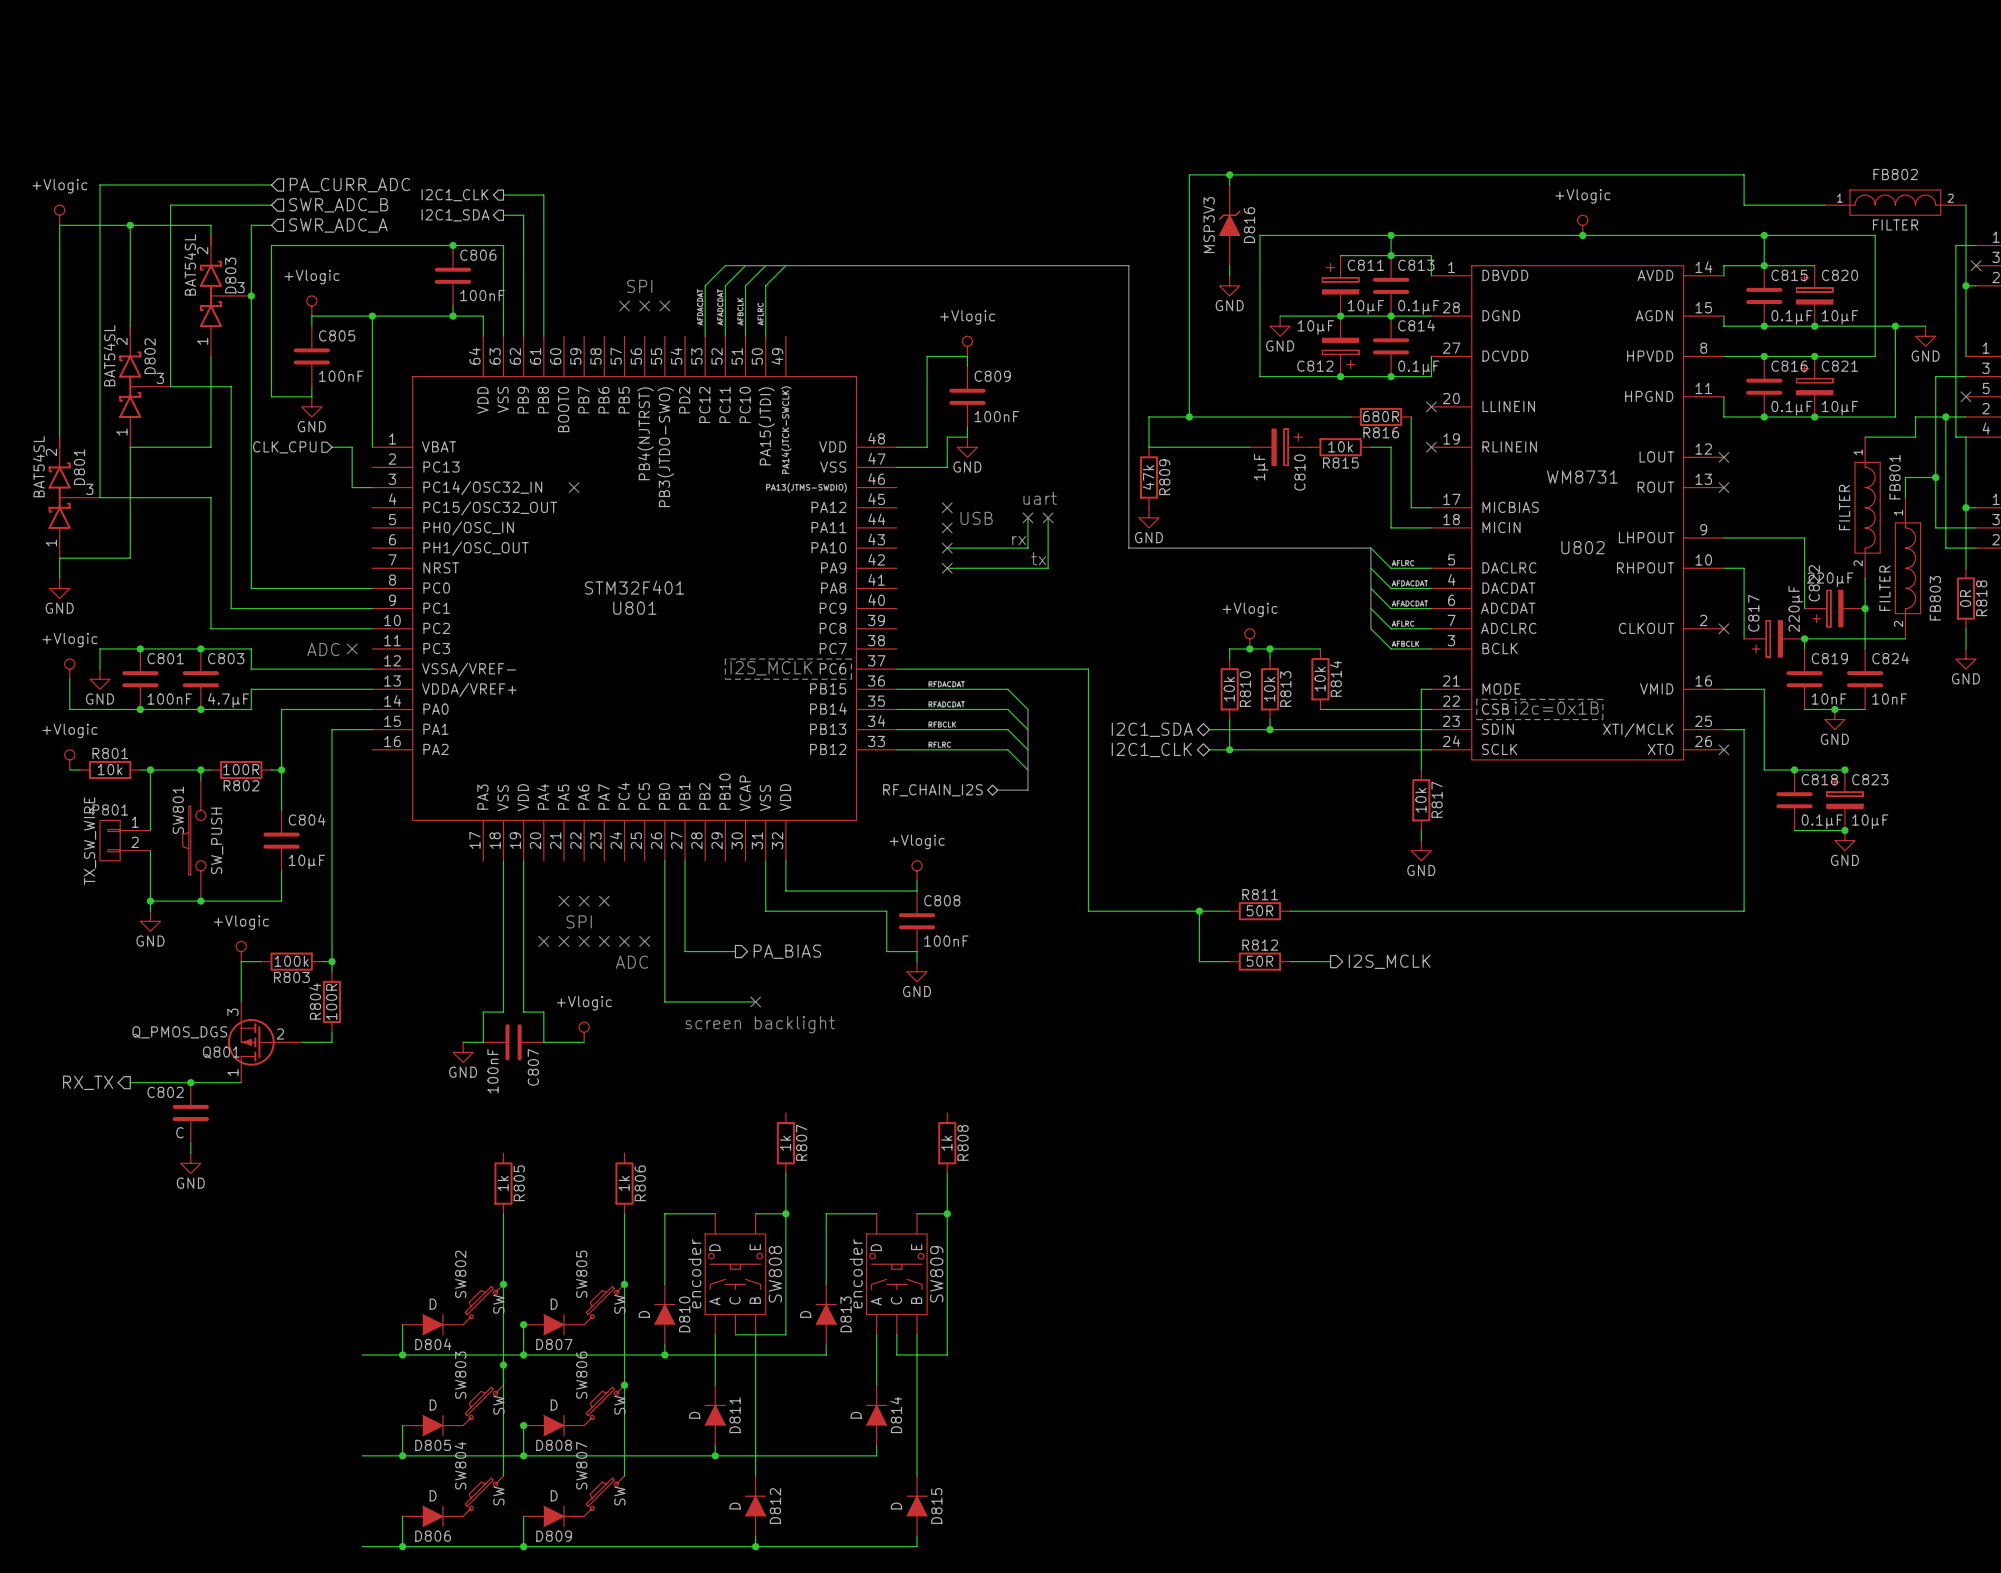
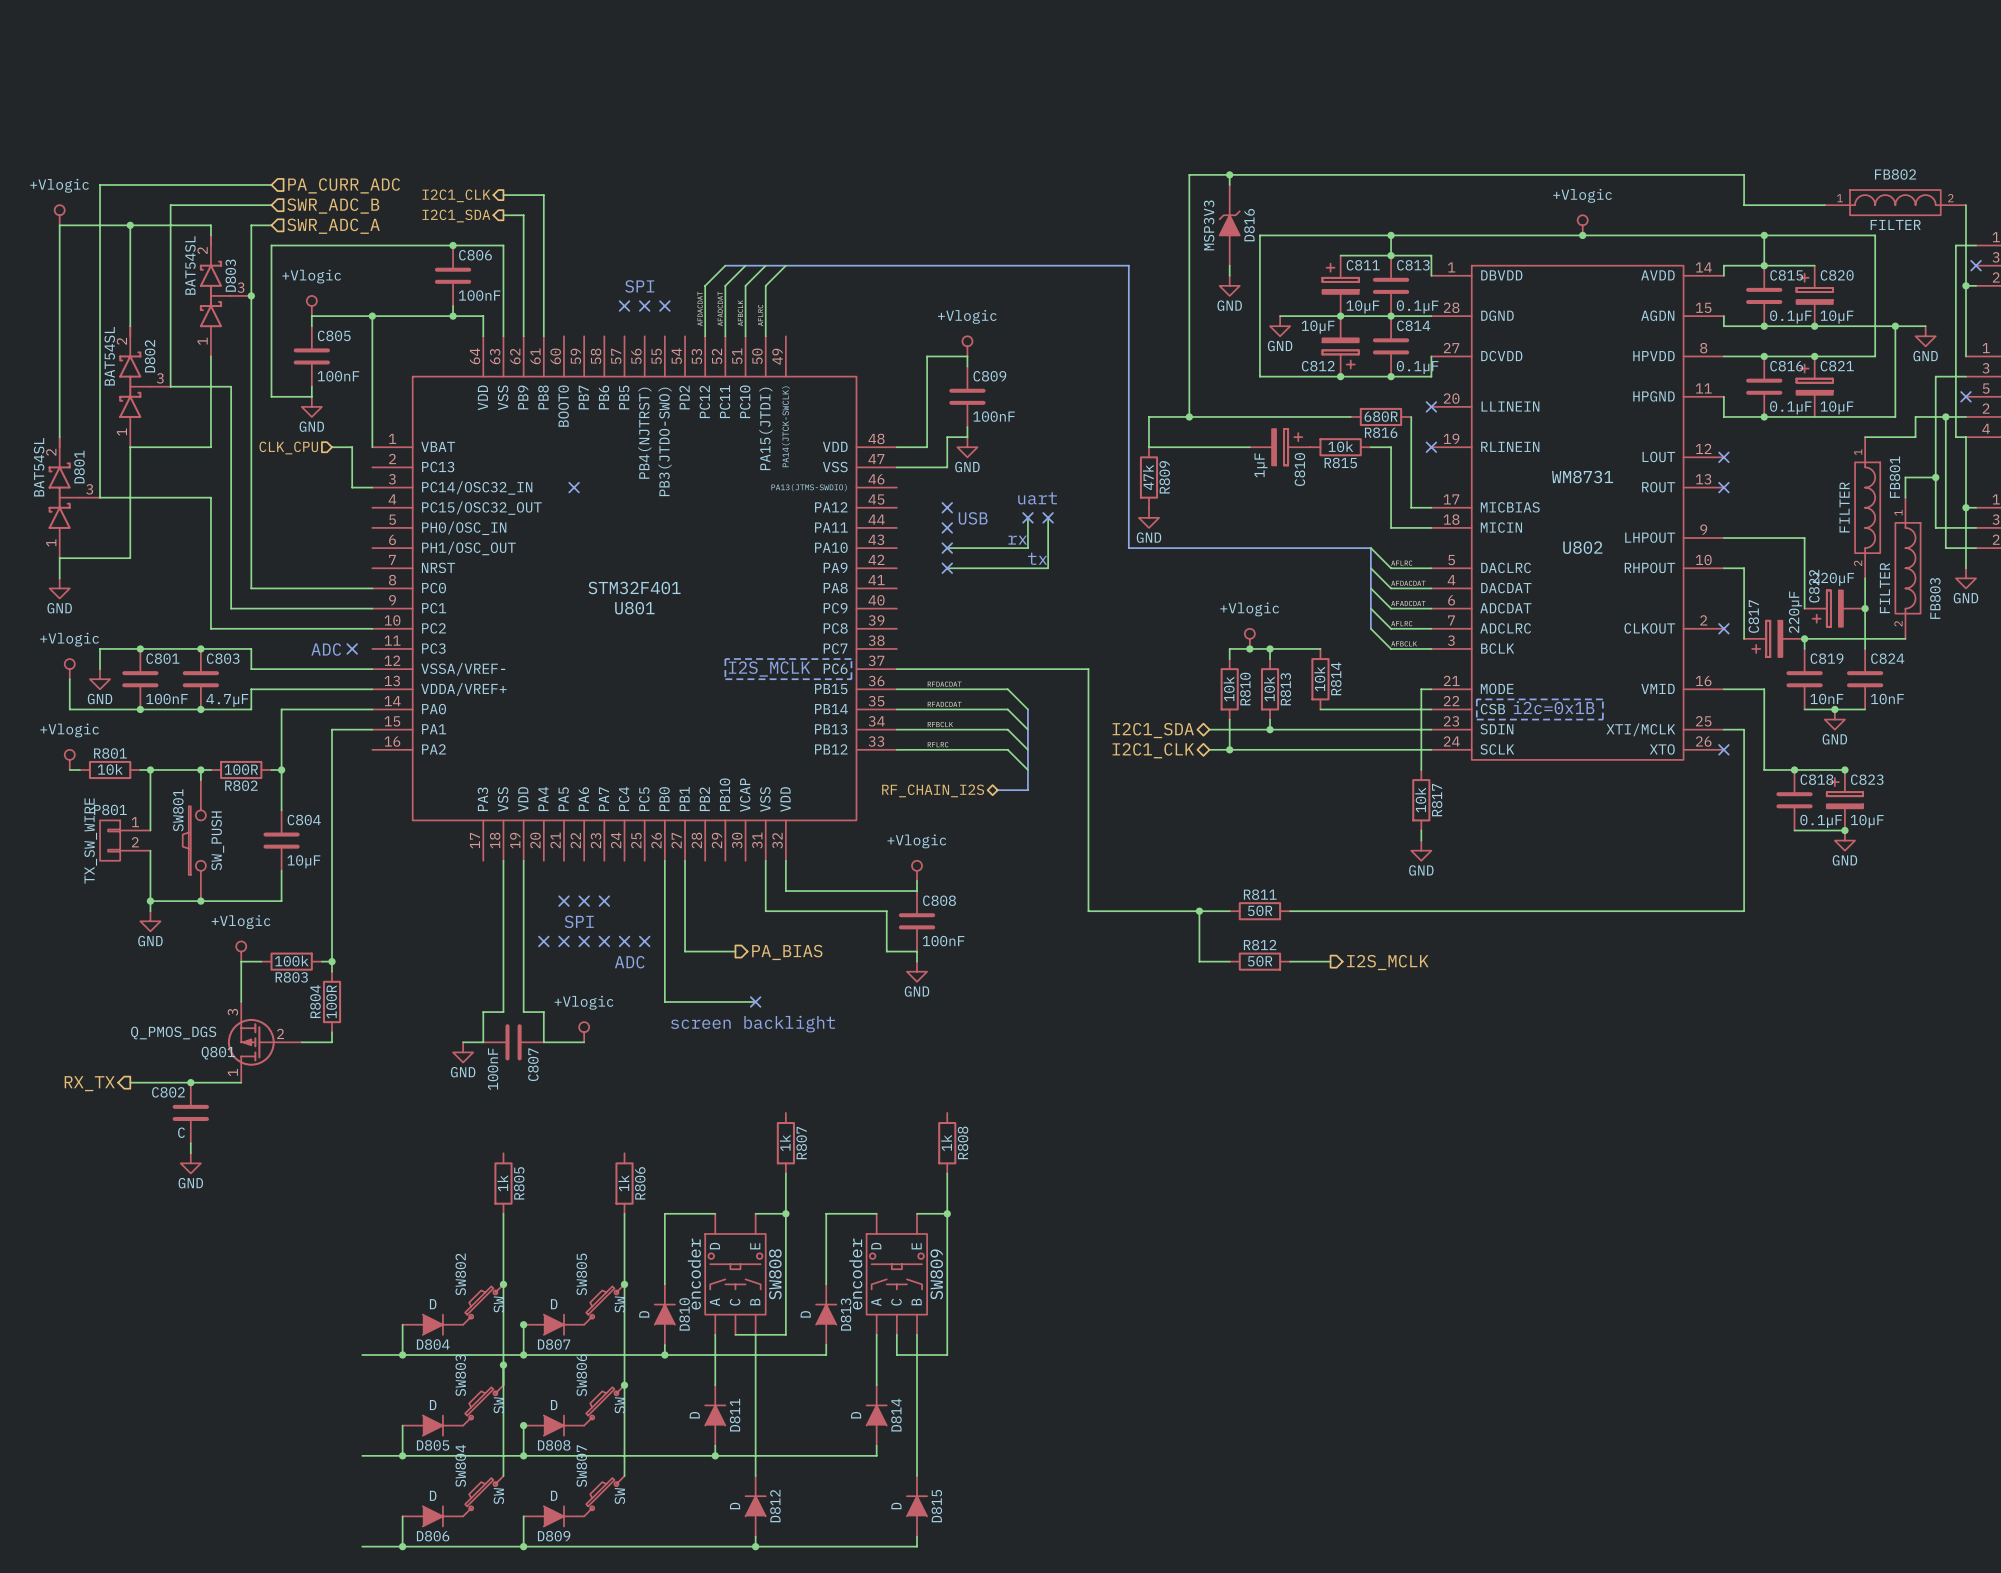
junction: (1814, 416) -> none
R818: 0R (1965, 598) -> none
wire: (1965, 628) (1965, 648) -> none
power symbol position: GND (1965, 659) -> GND (1965, 578)

